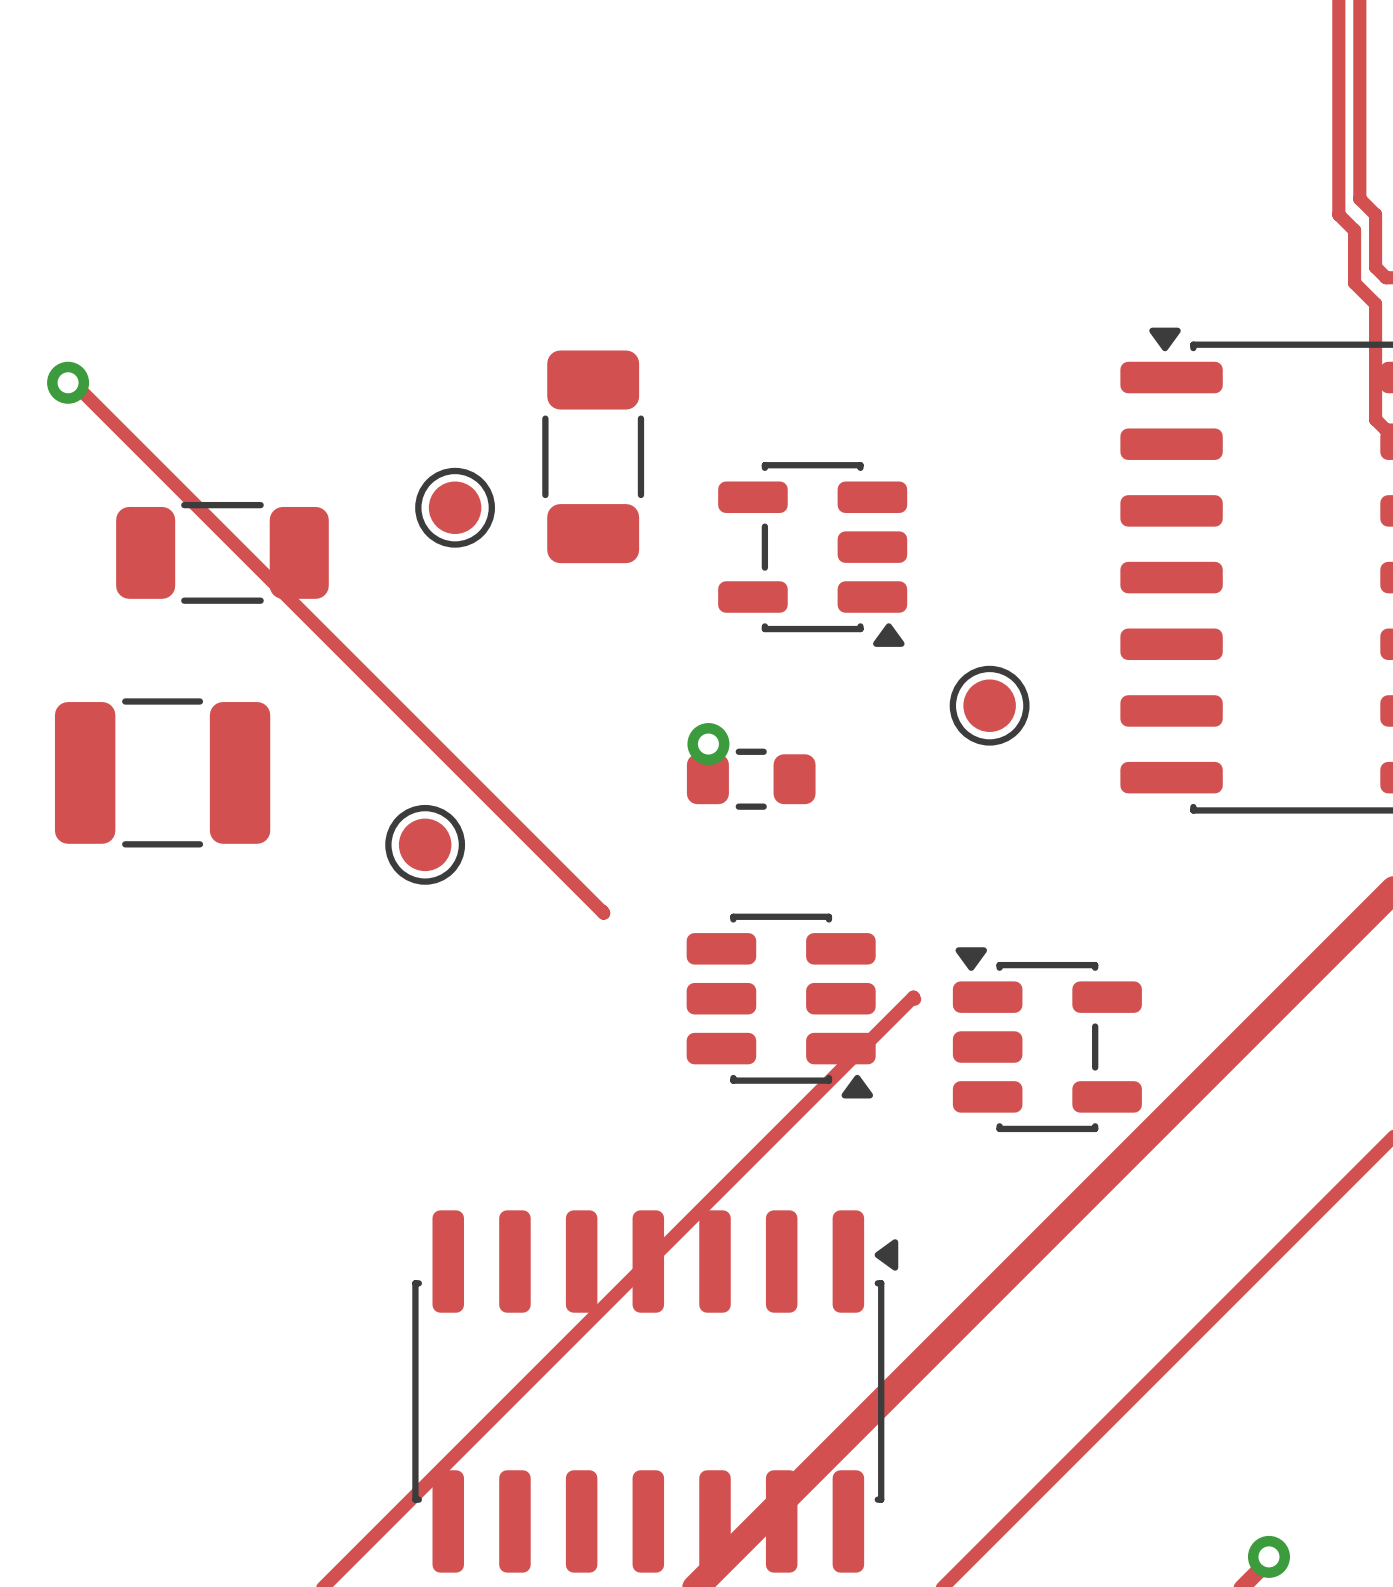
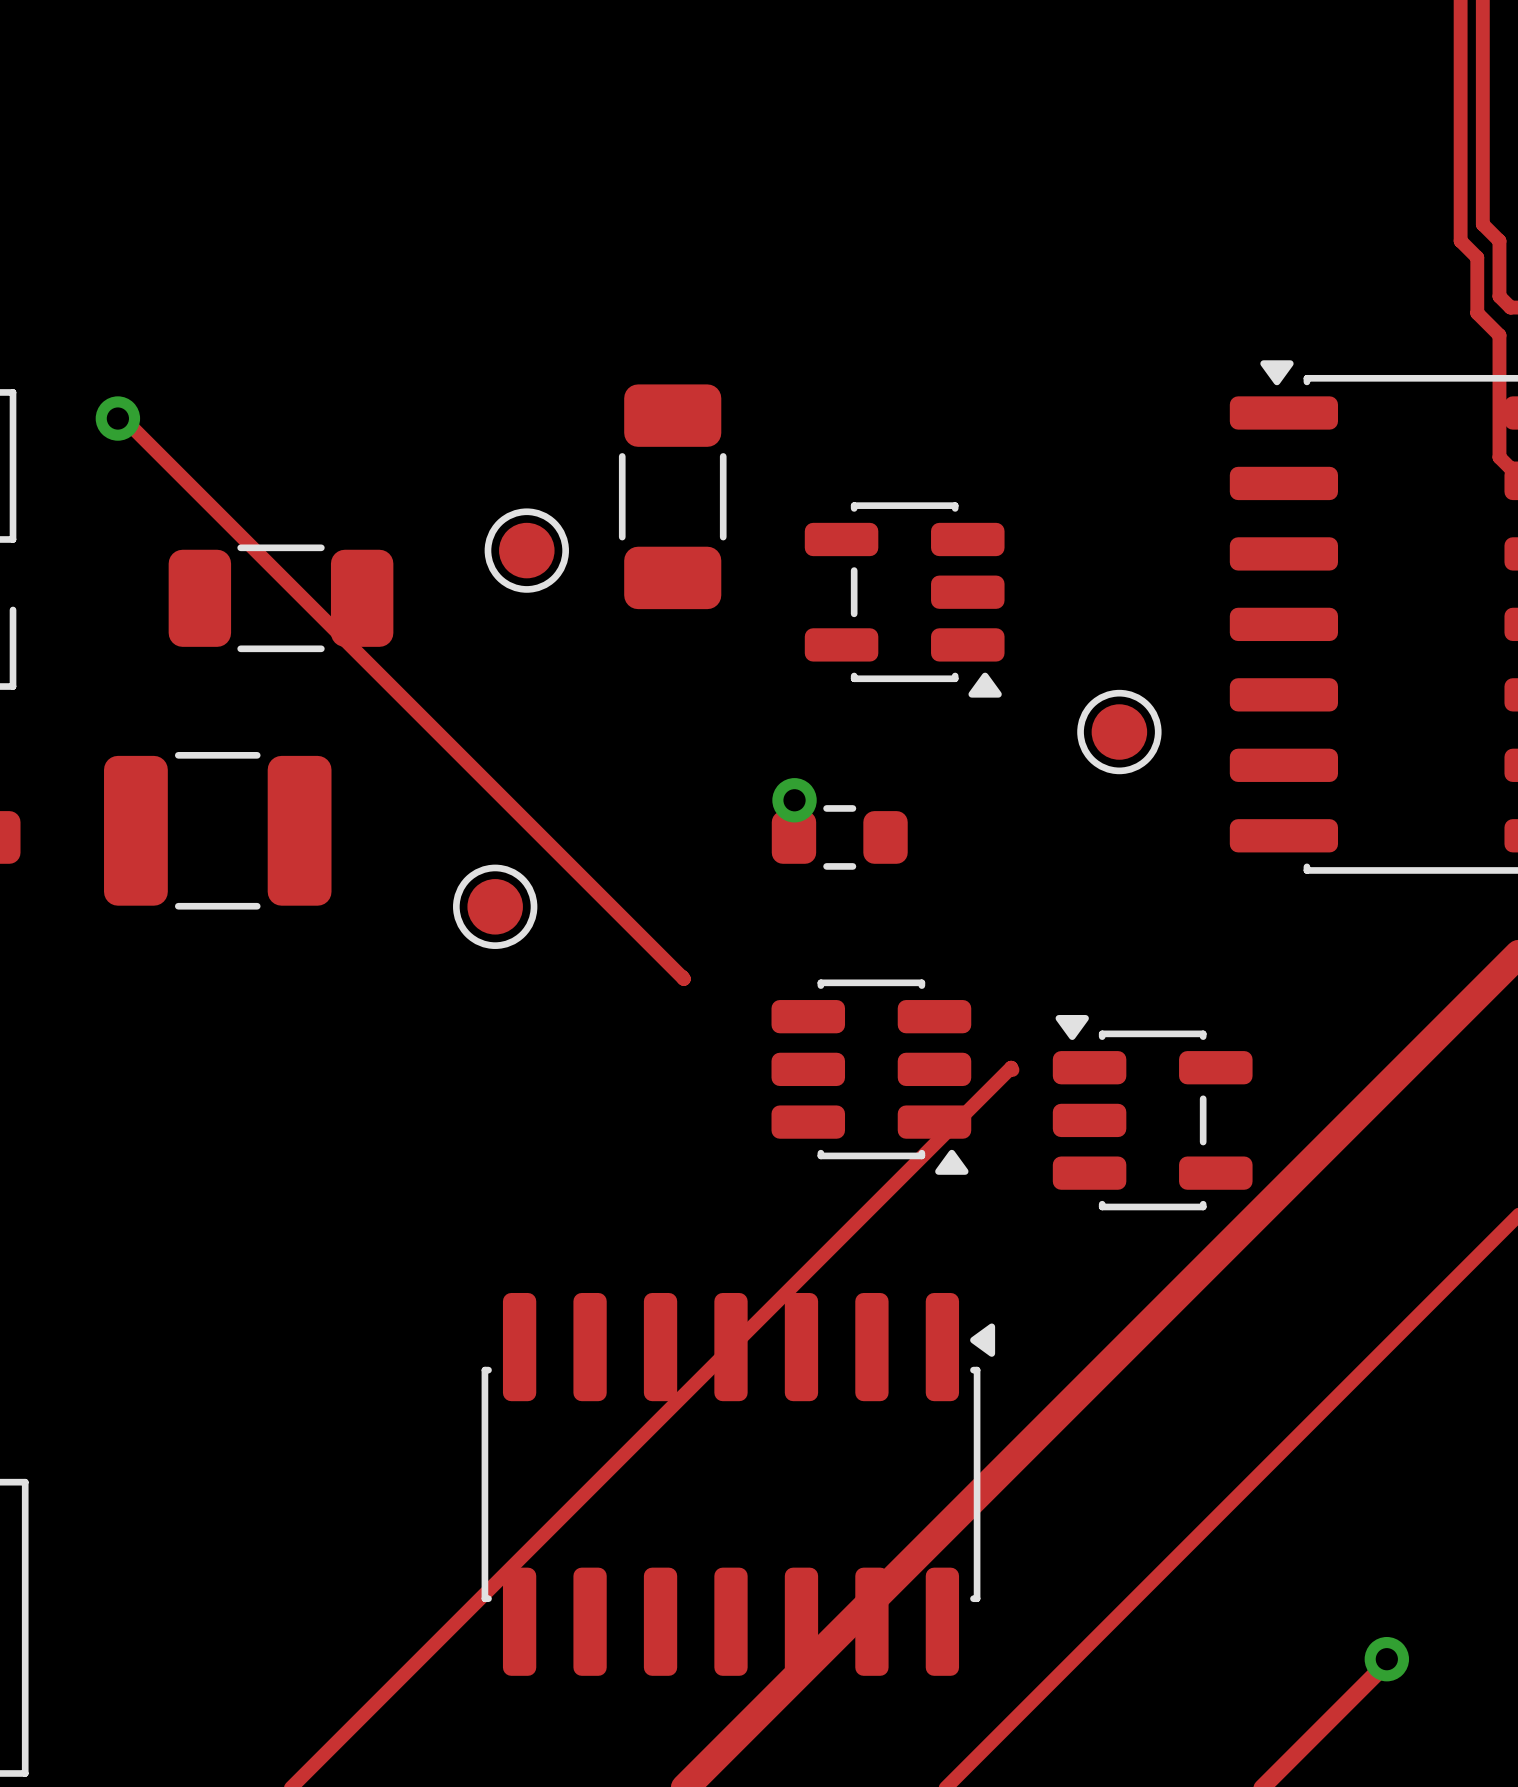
part position: (989, 705) -> (1119, 732)

